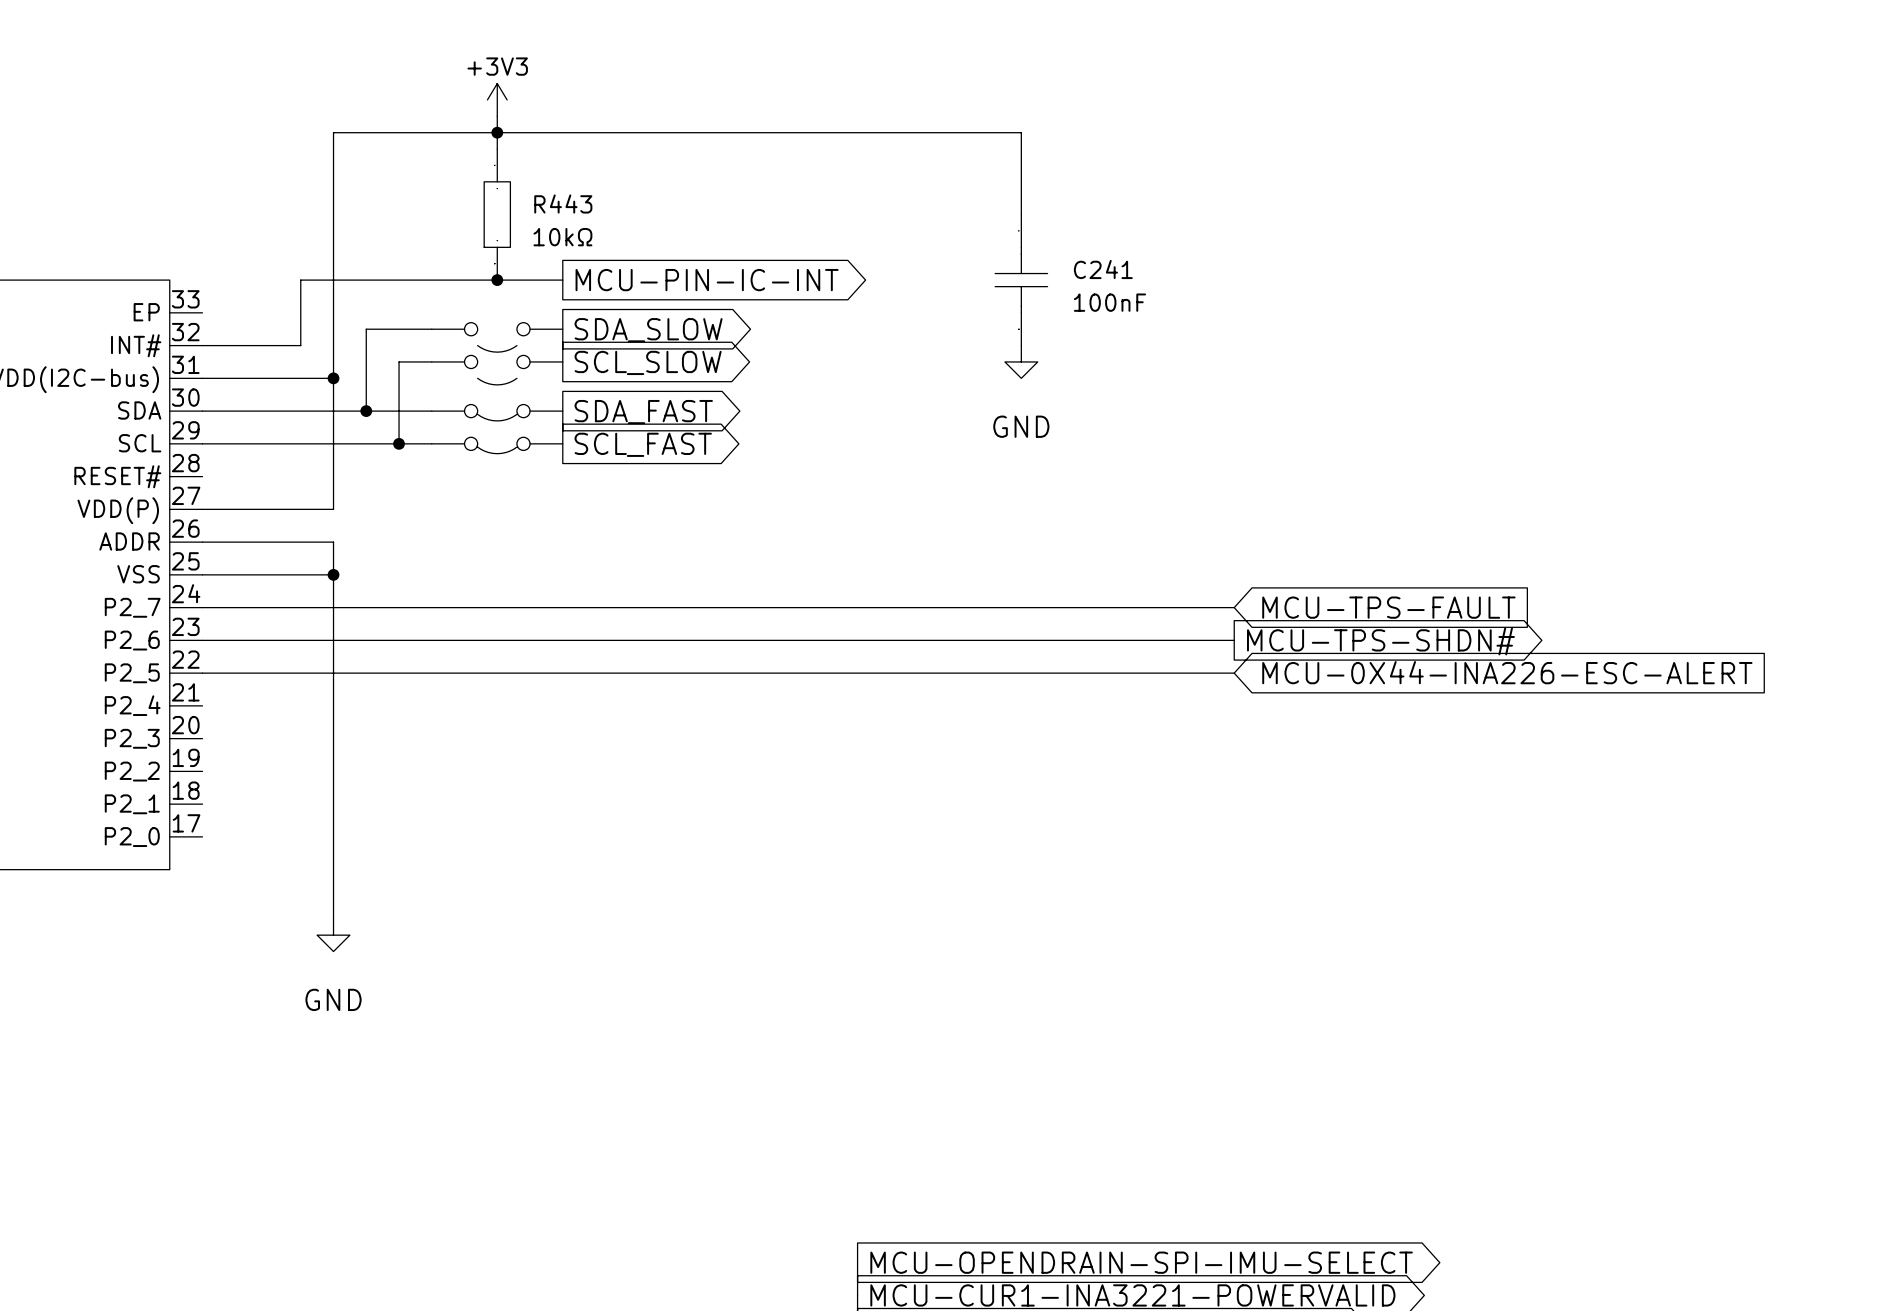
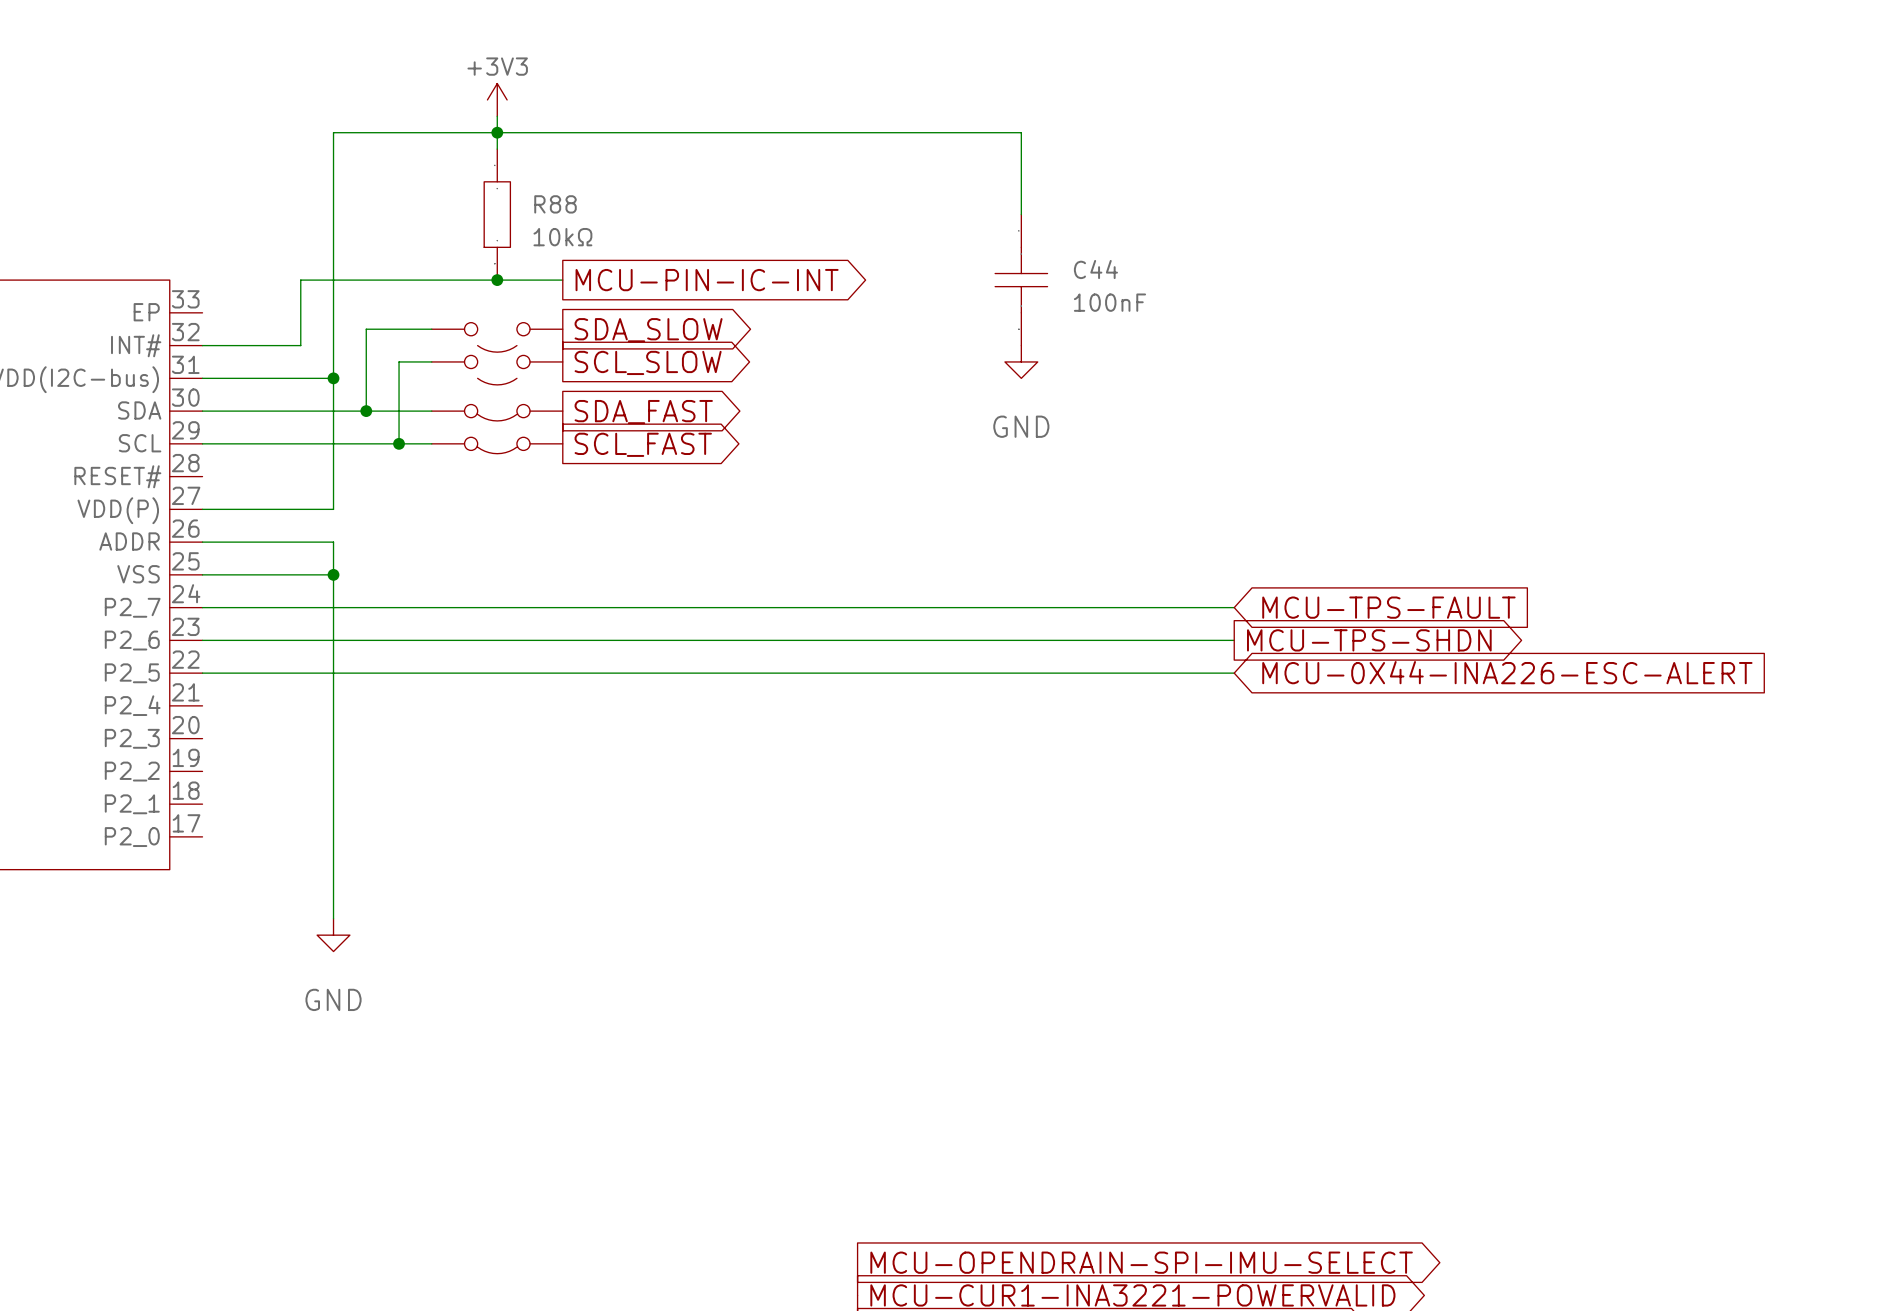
R443 name: R443 (563, 204) -> R88 (555, 204)
C241 name: C241 (1103, 269) -> C44 (1095, 269)
global label: MCU-TPS-SHDN# (1380, 641) -> MCU-TPS-SHDN (1369, 640)

